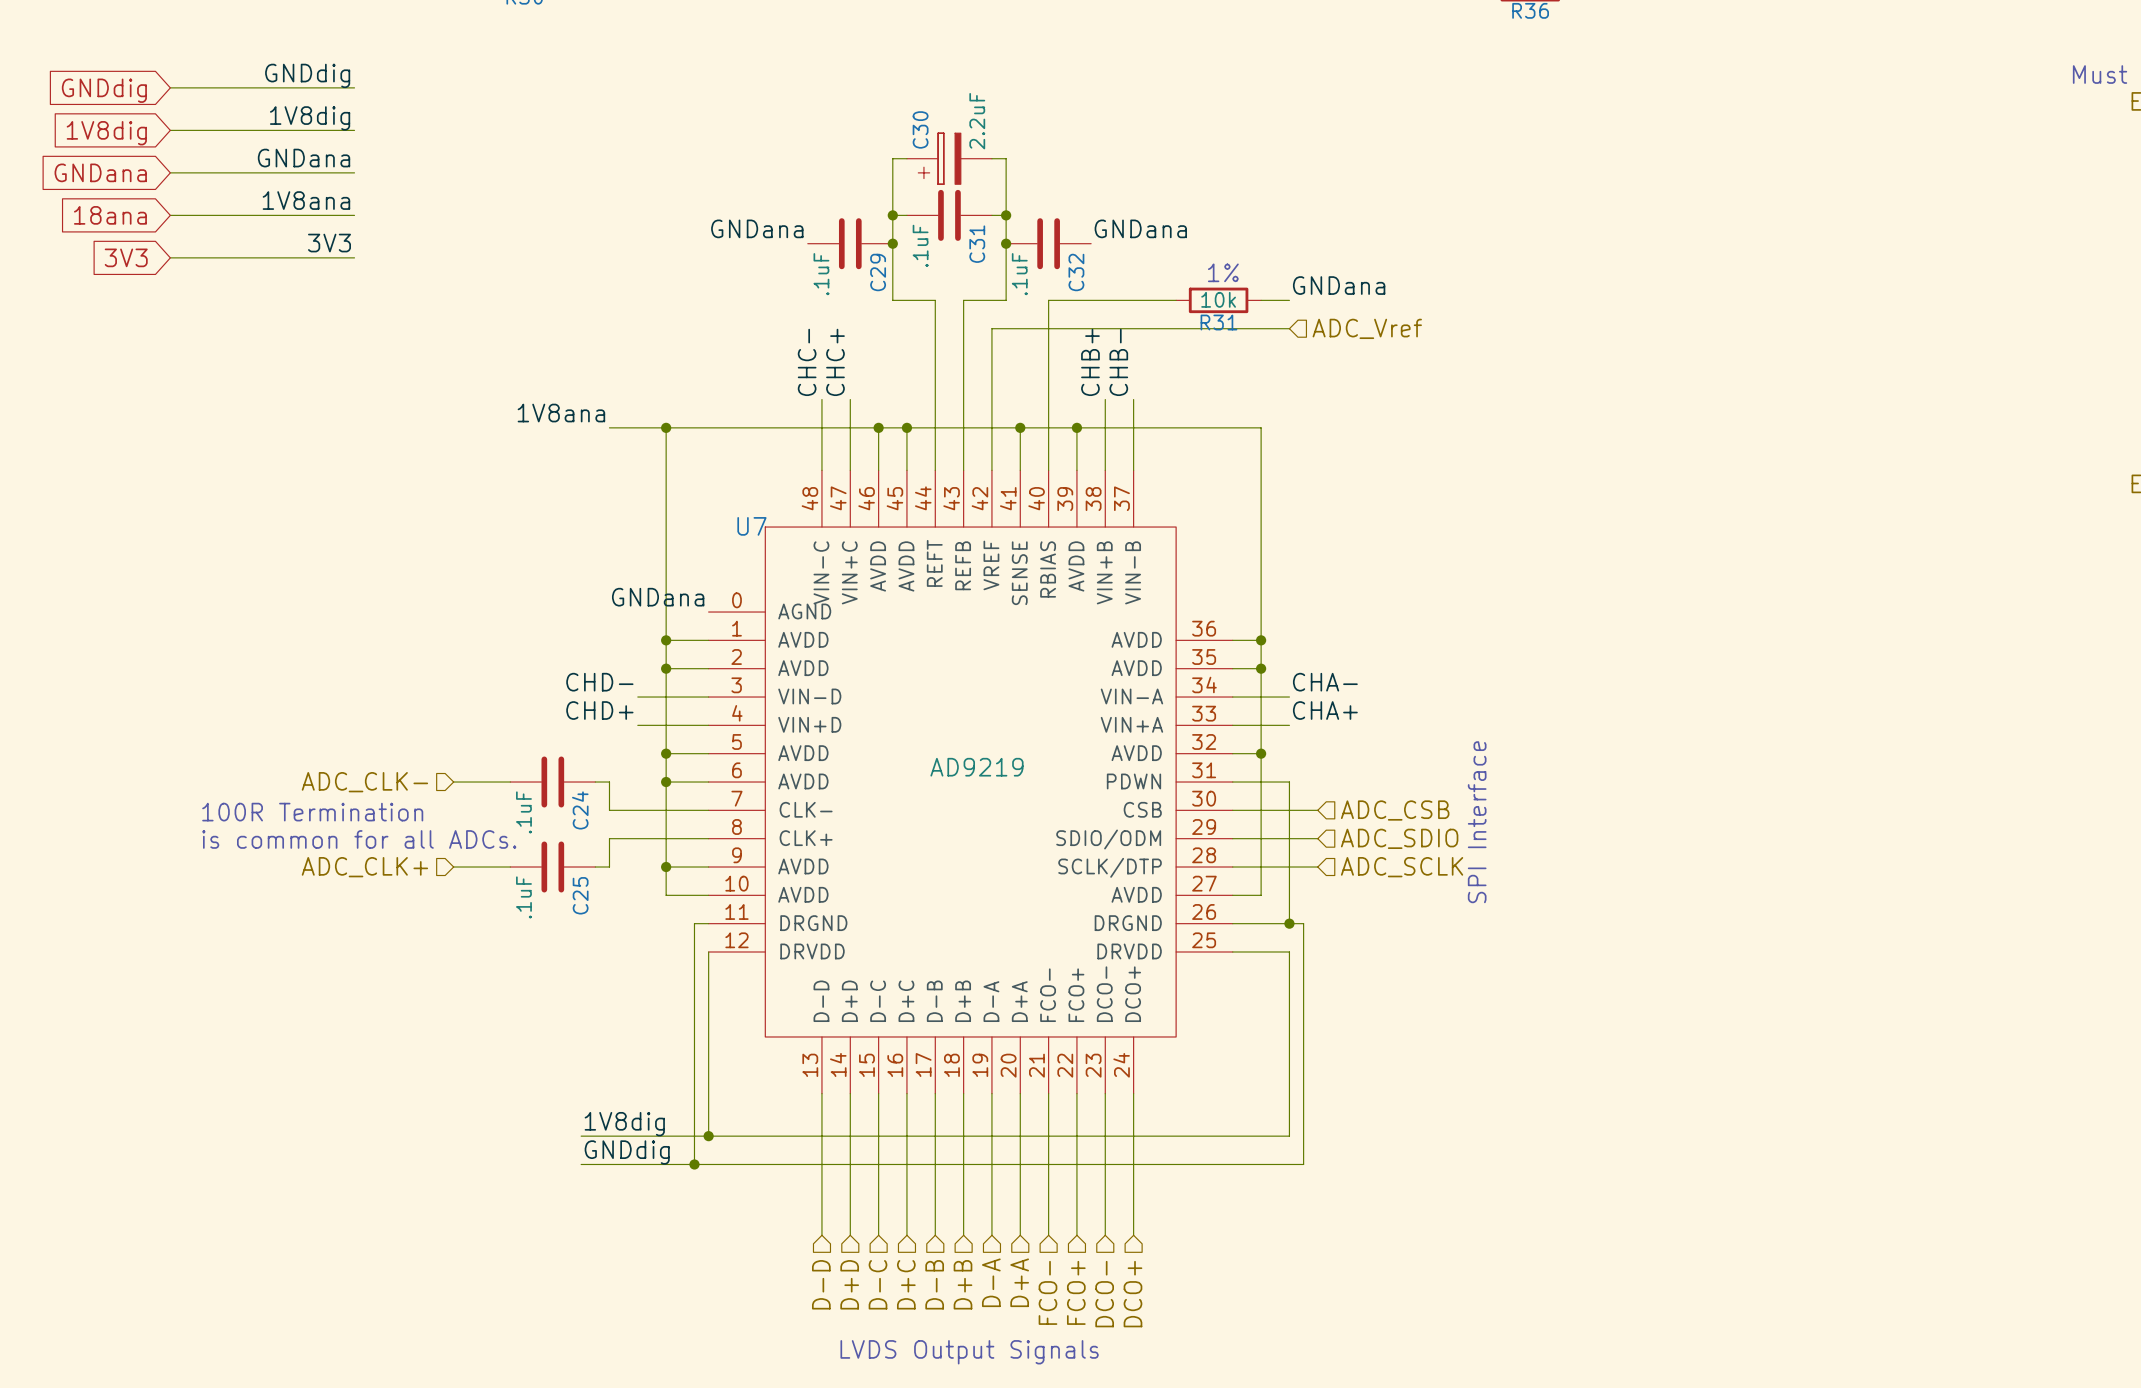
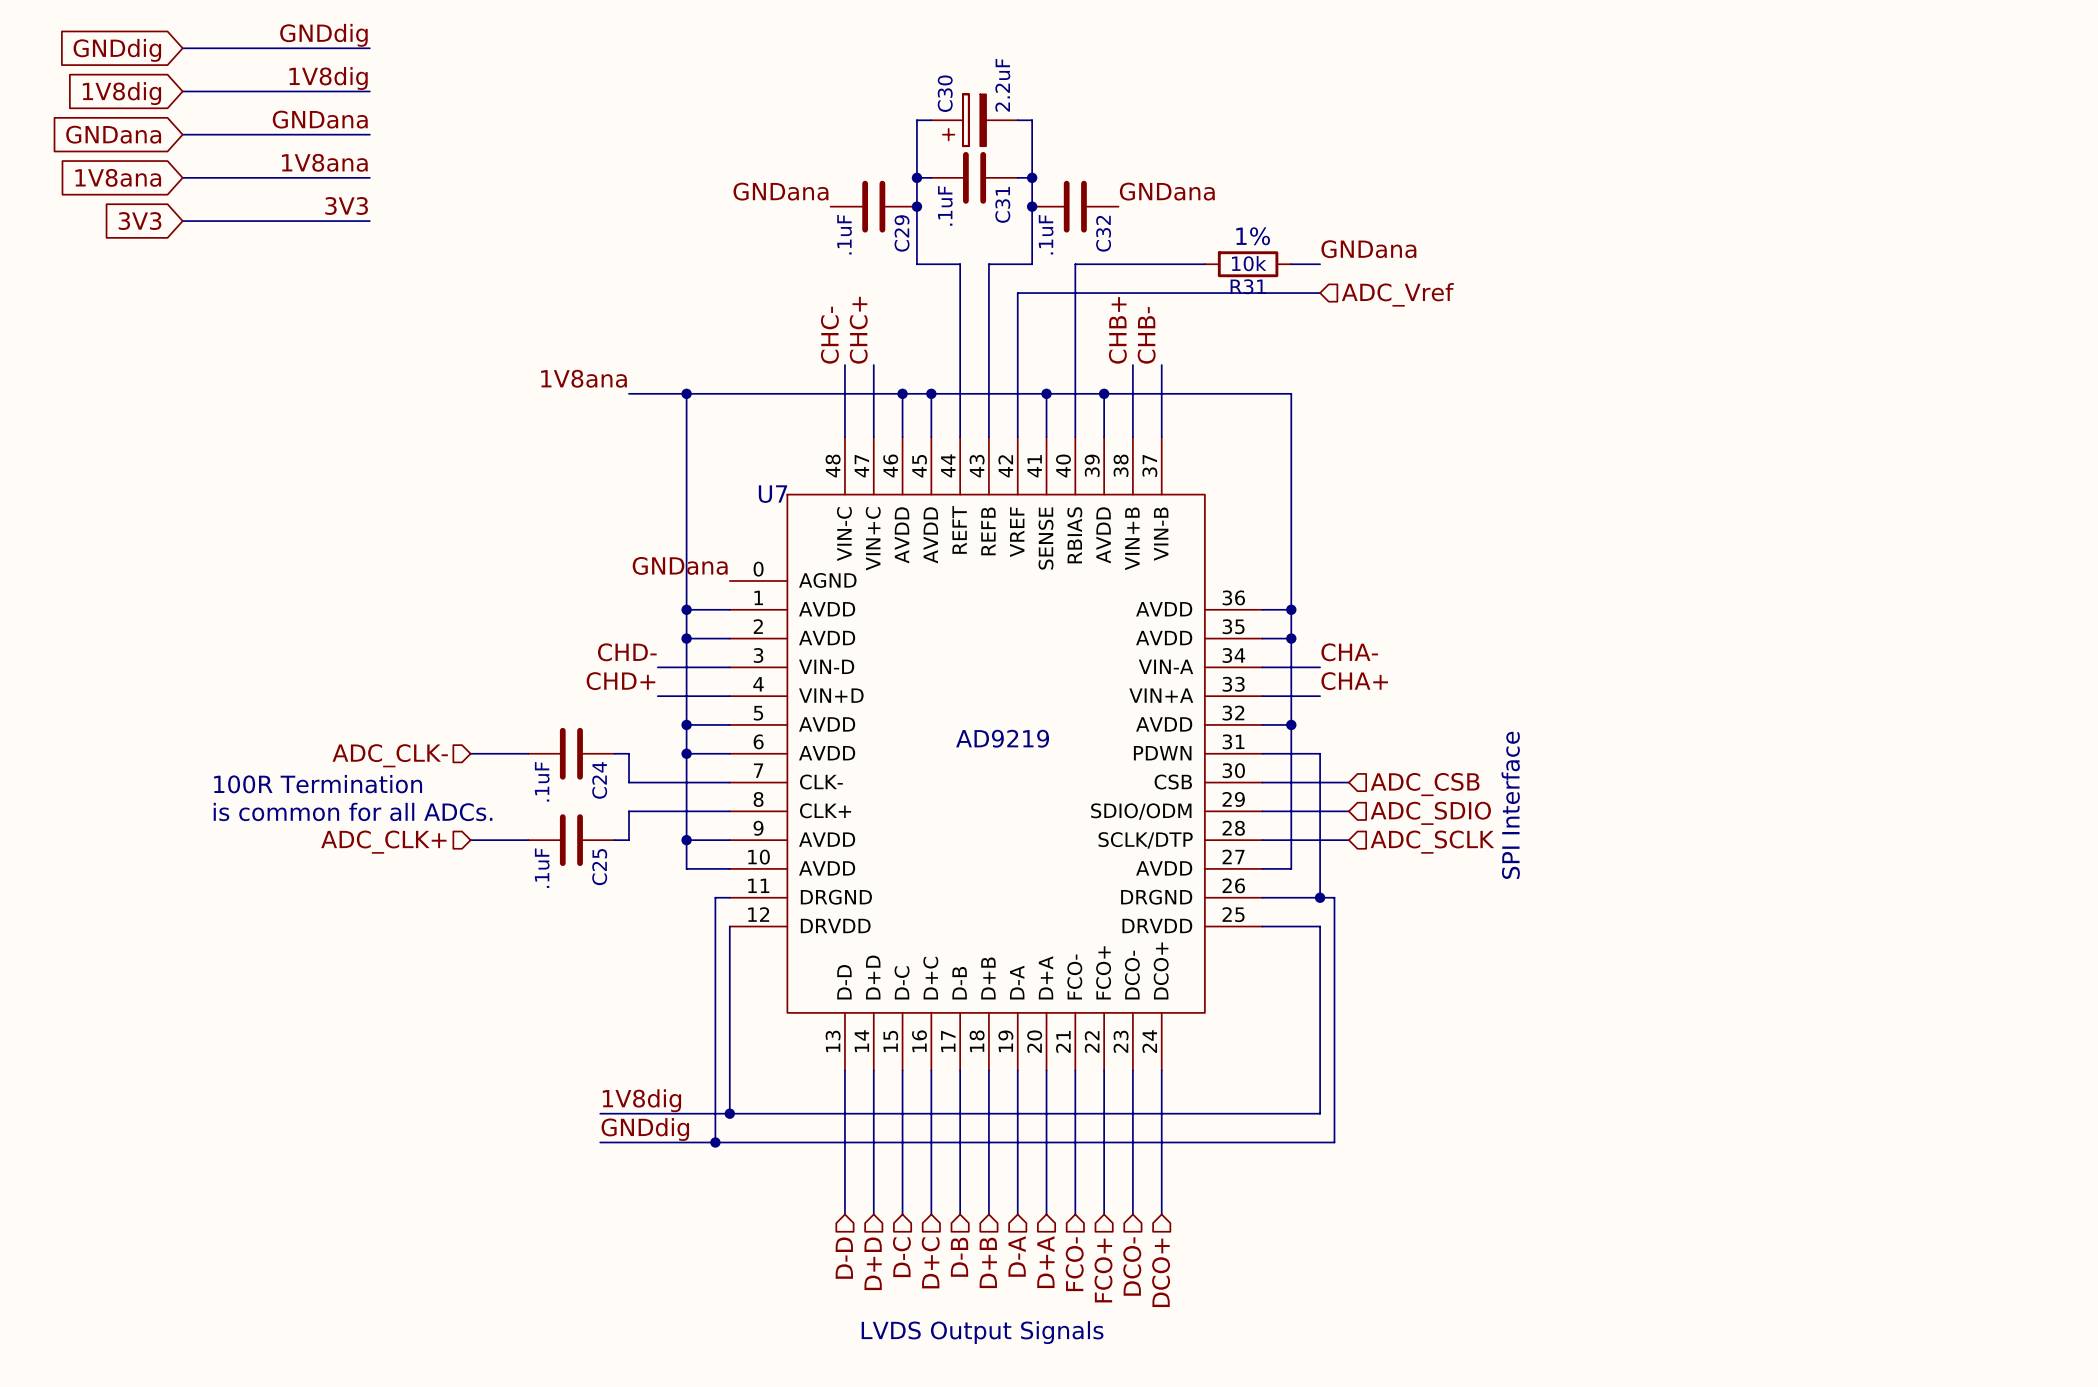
global label: 18ana (110, 215) -> 1V8ana (118, 177)

